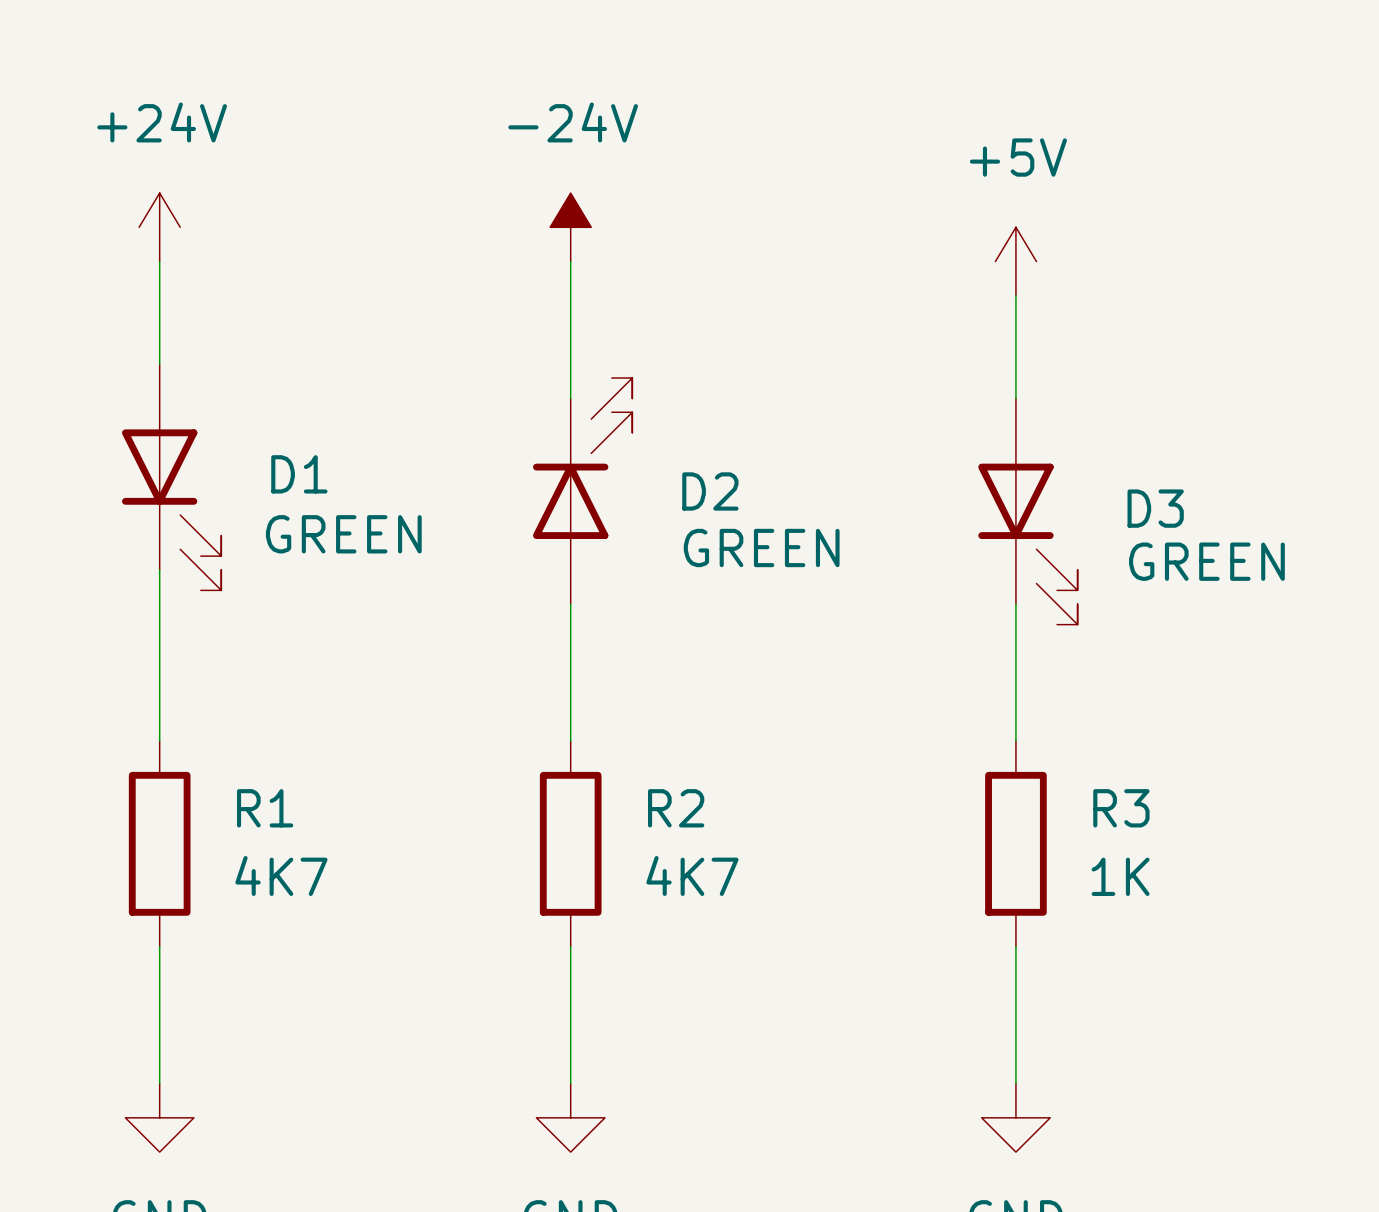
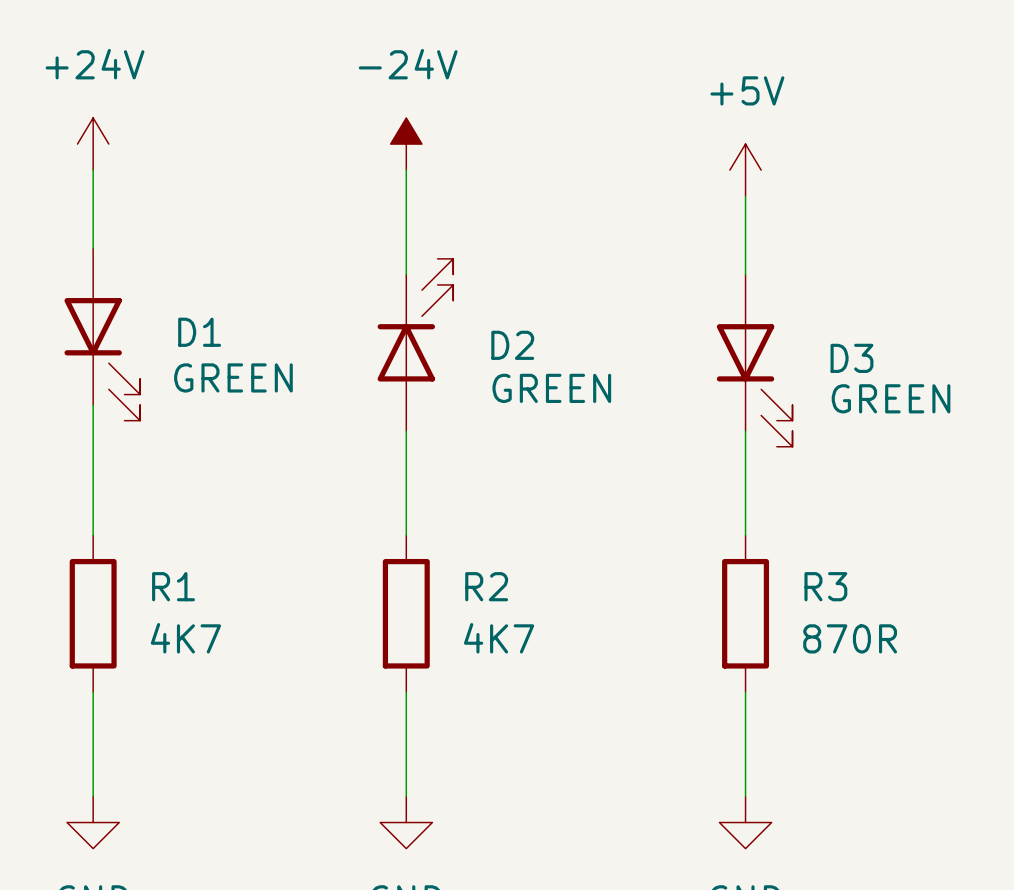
R3 value: 1K (1120, 876) -> 870R (850, 638)

